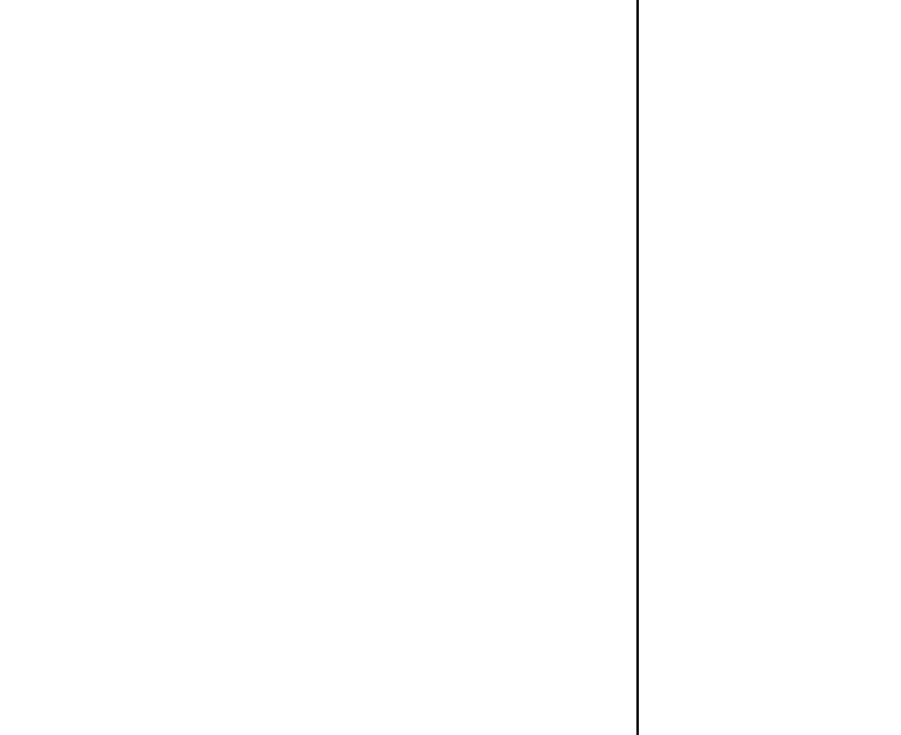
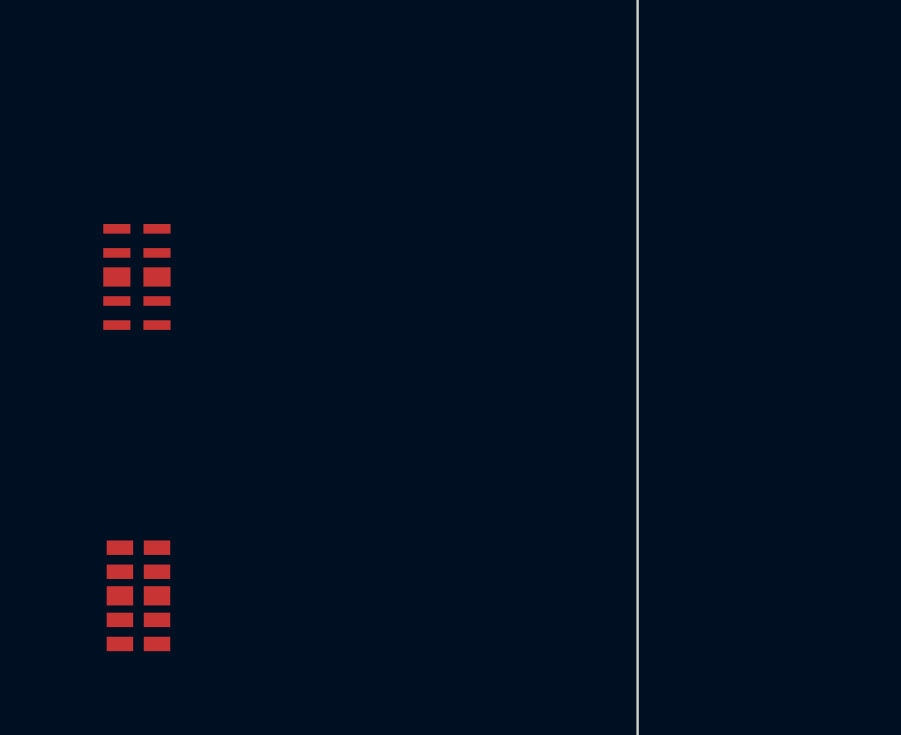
part: none -> (136, 276)
part: none -> (138, 595)

